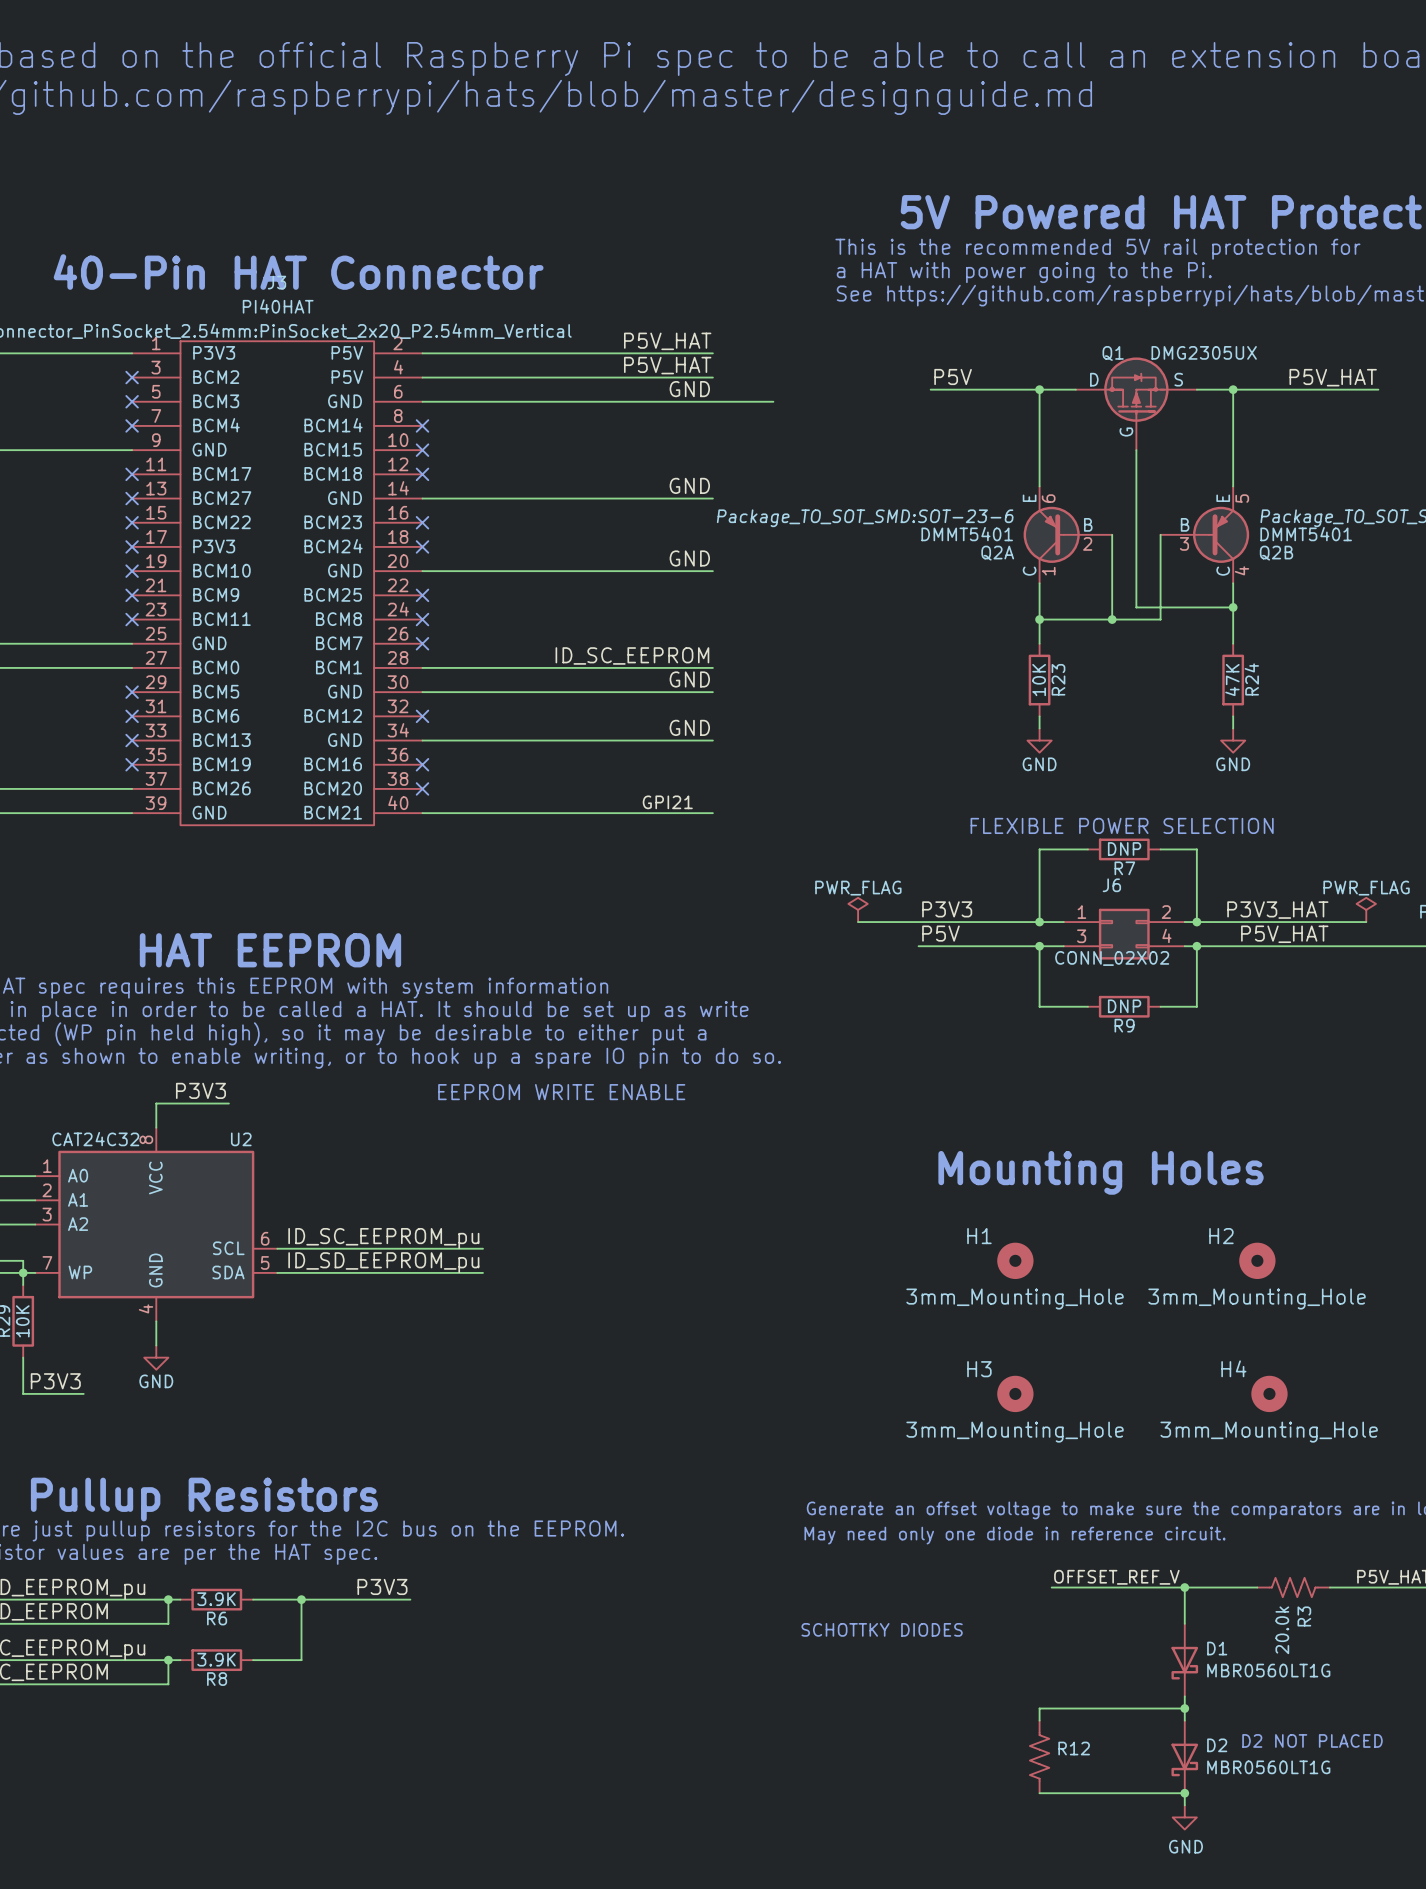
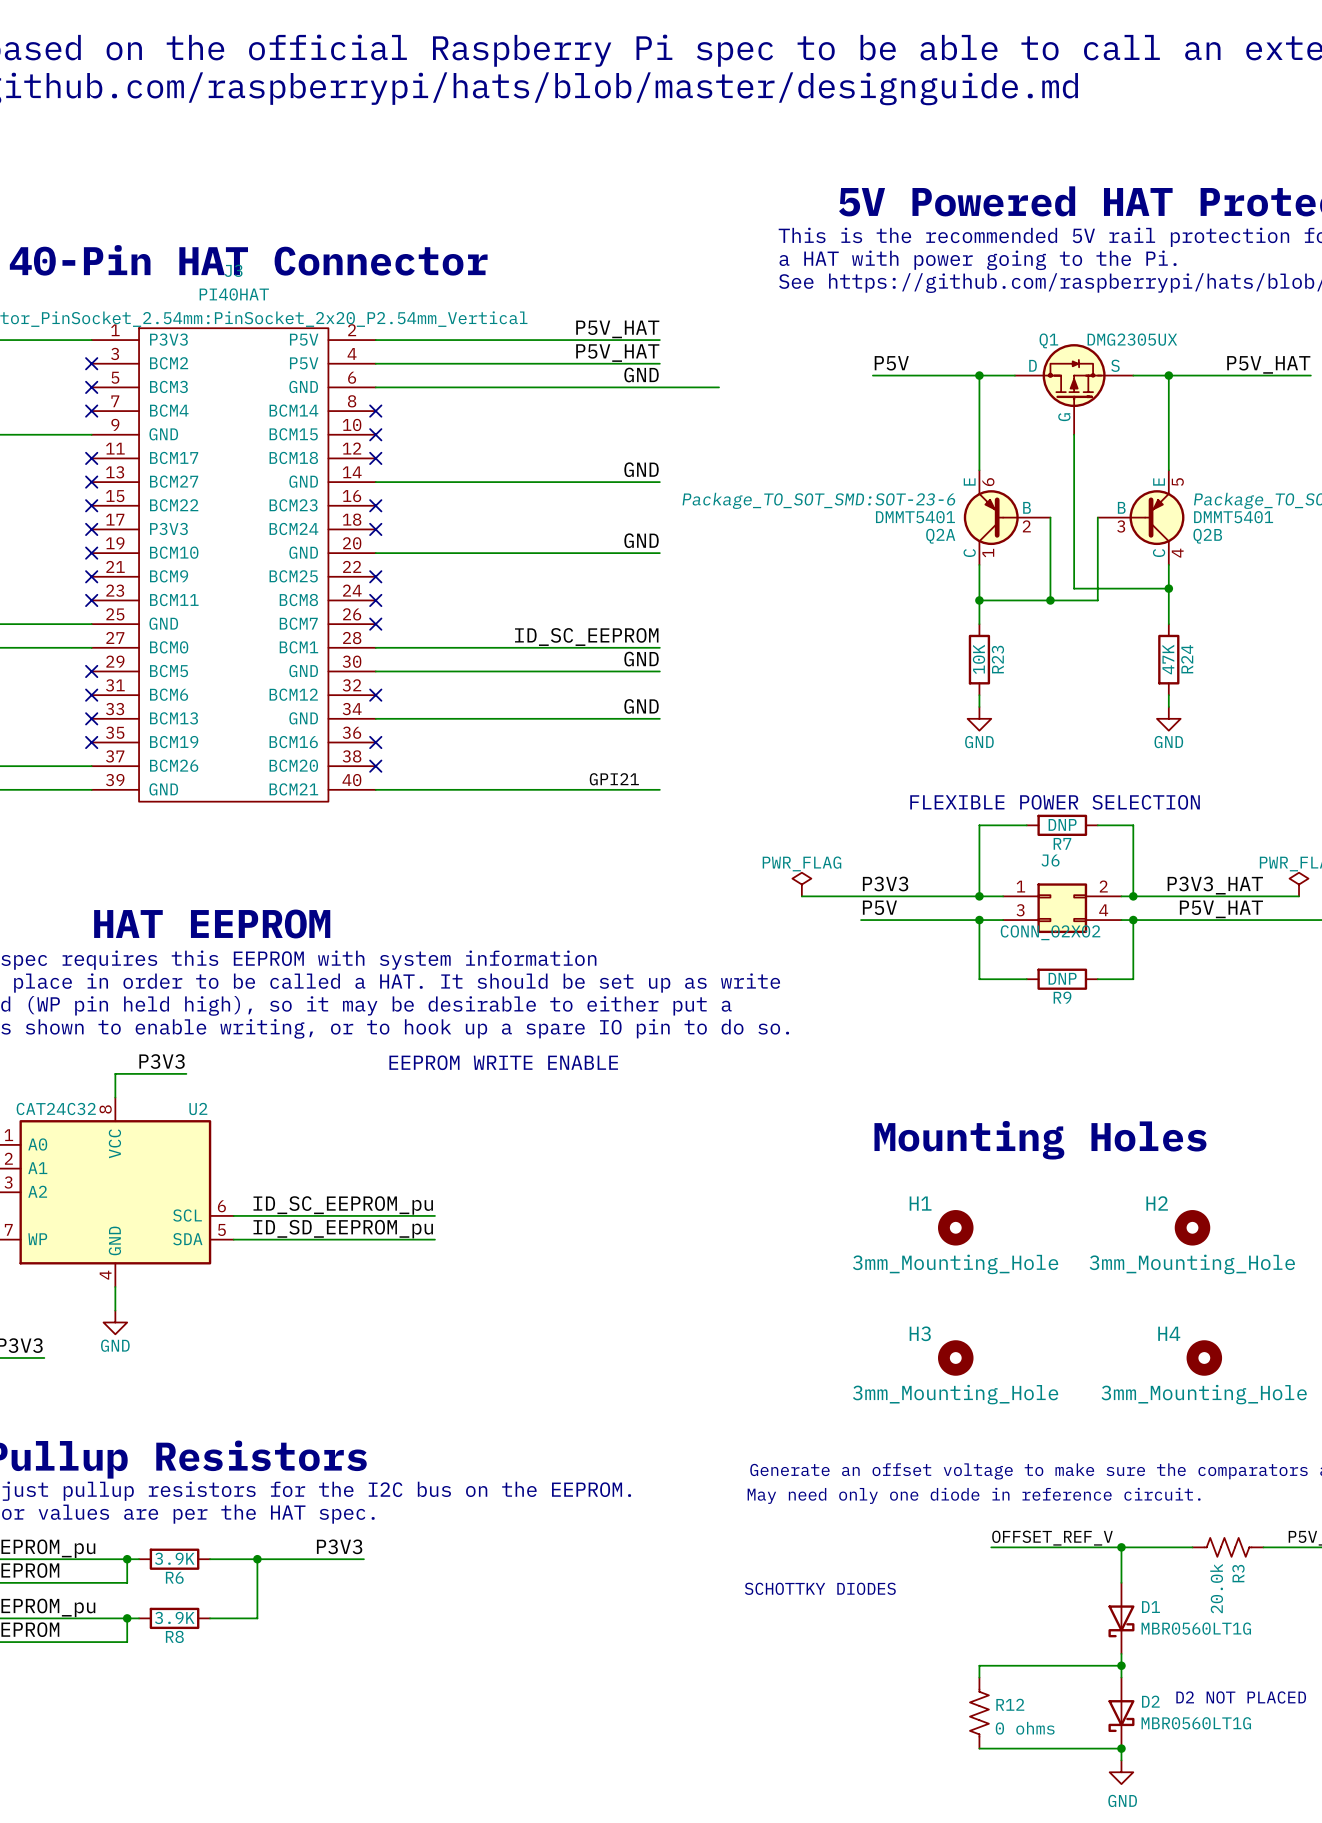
R12 value: none -> 0 ohms (1025, 1728)

